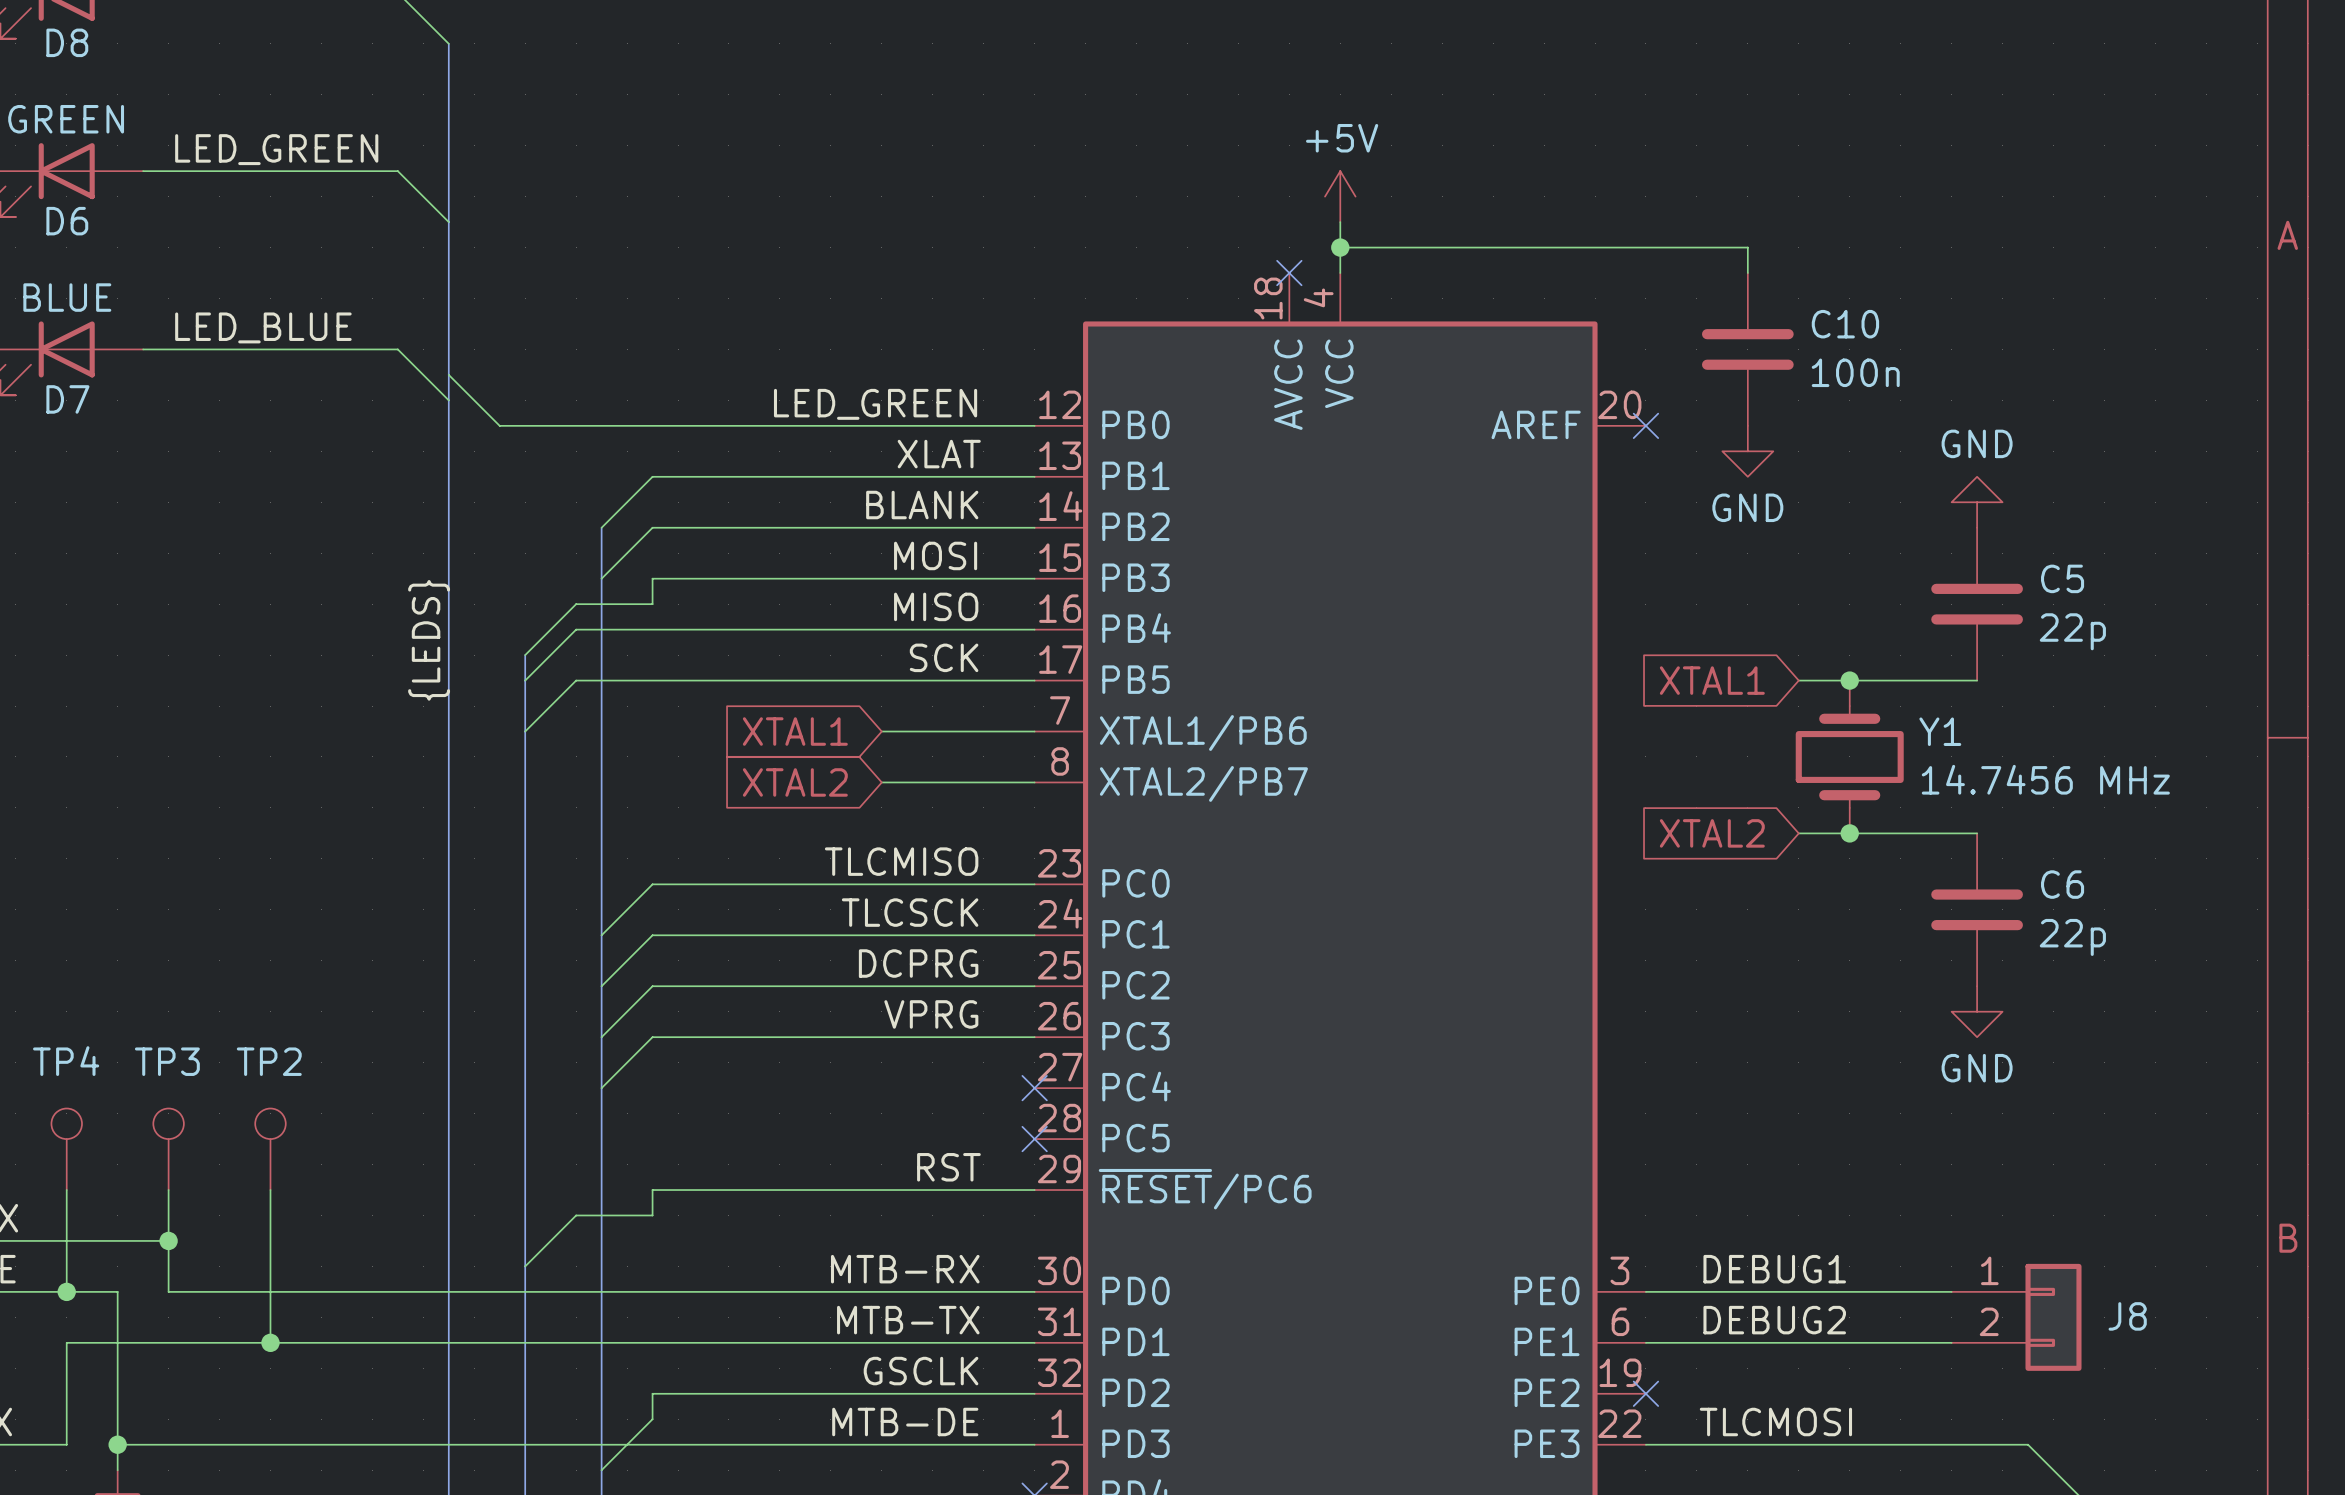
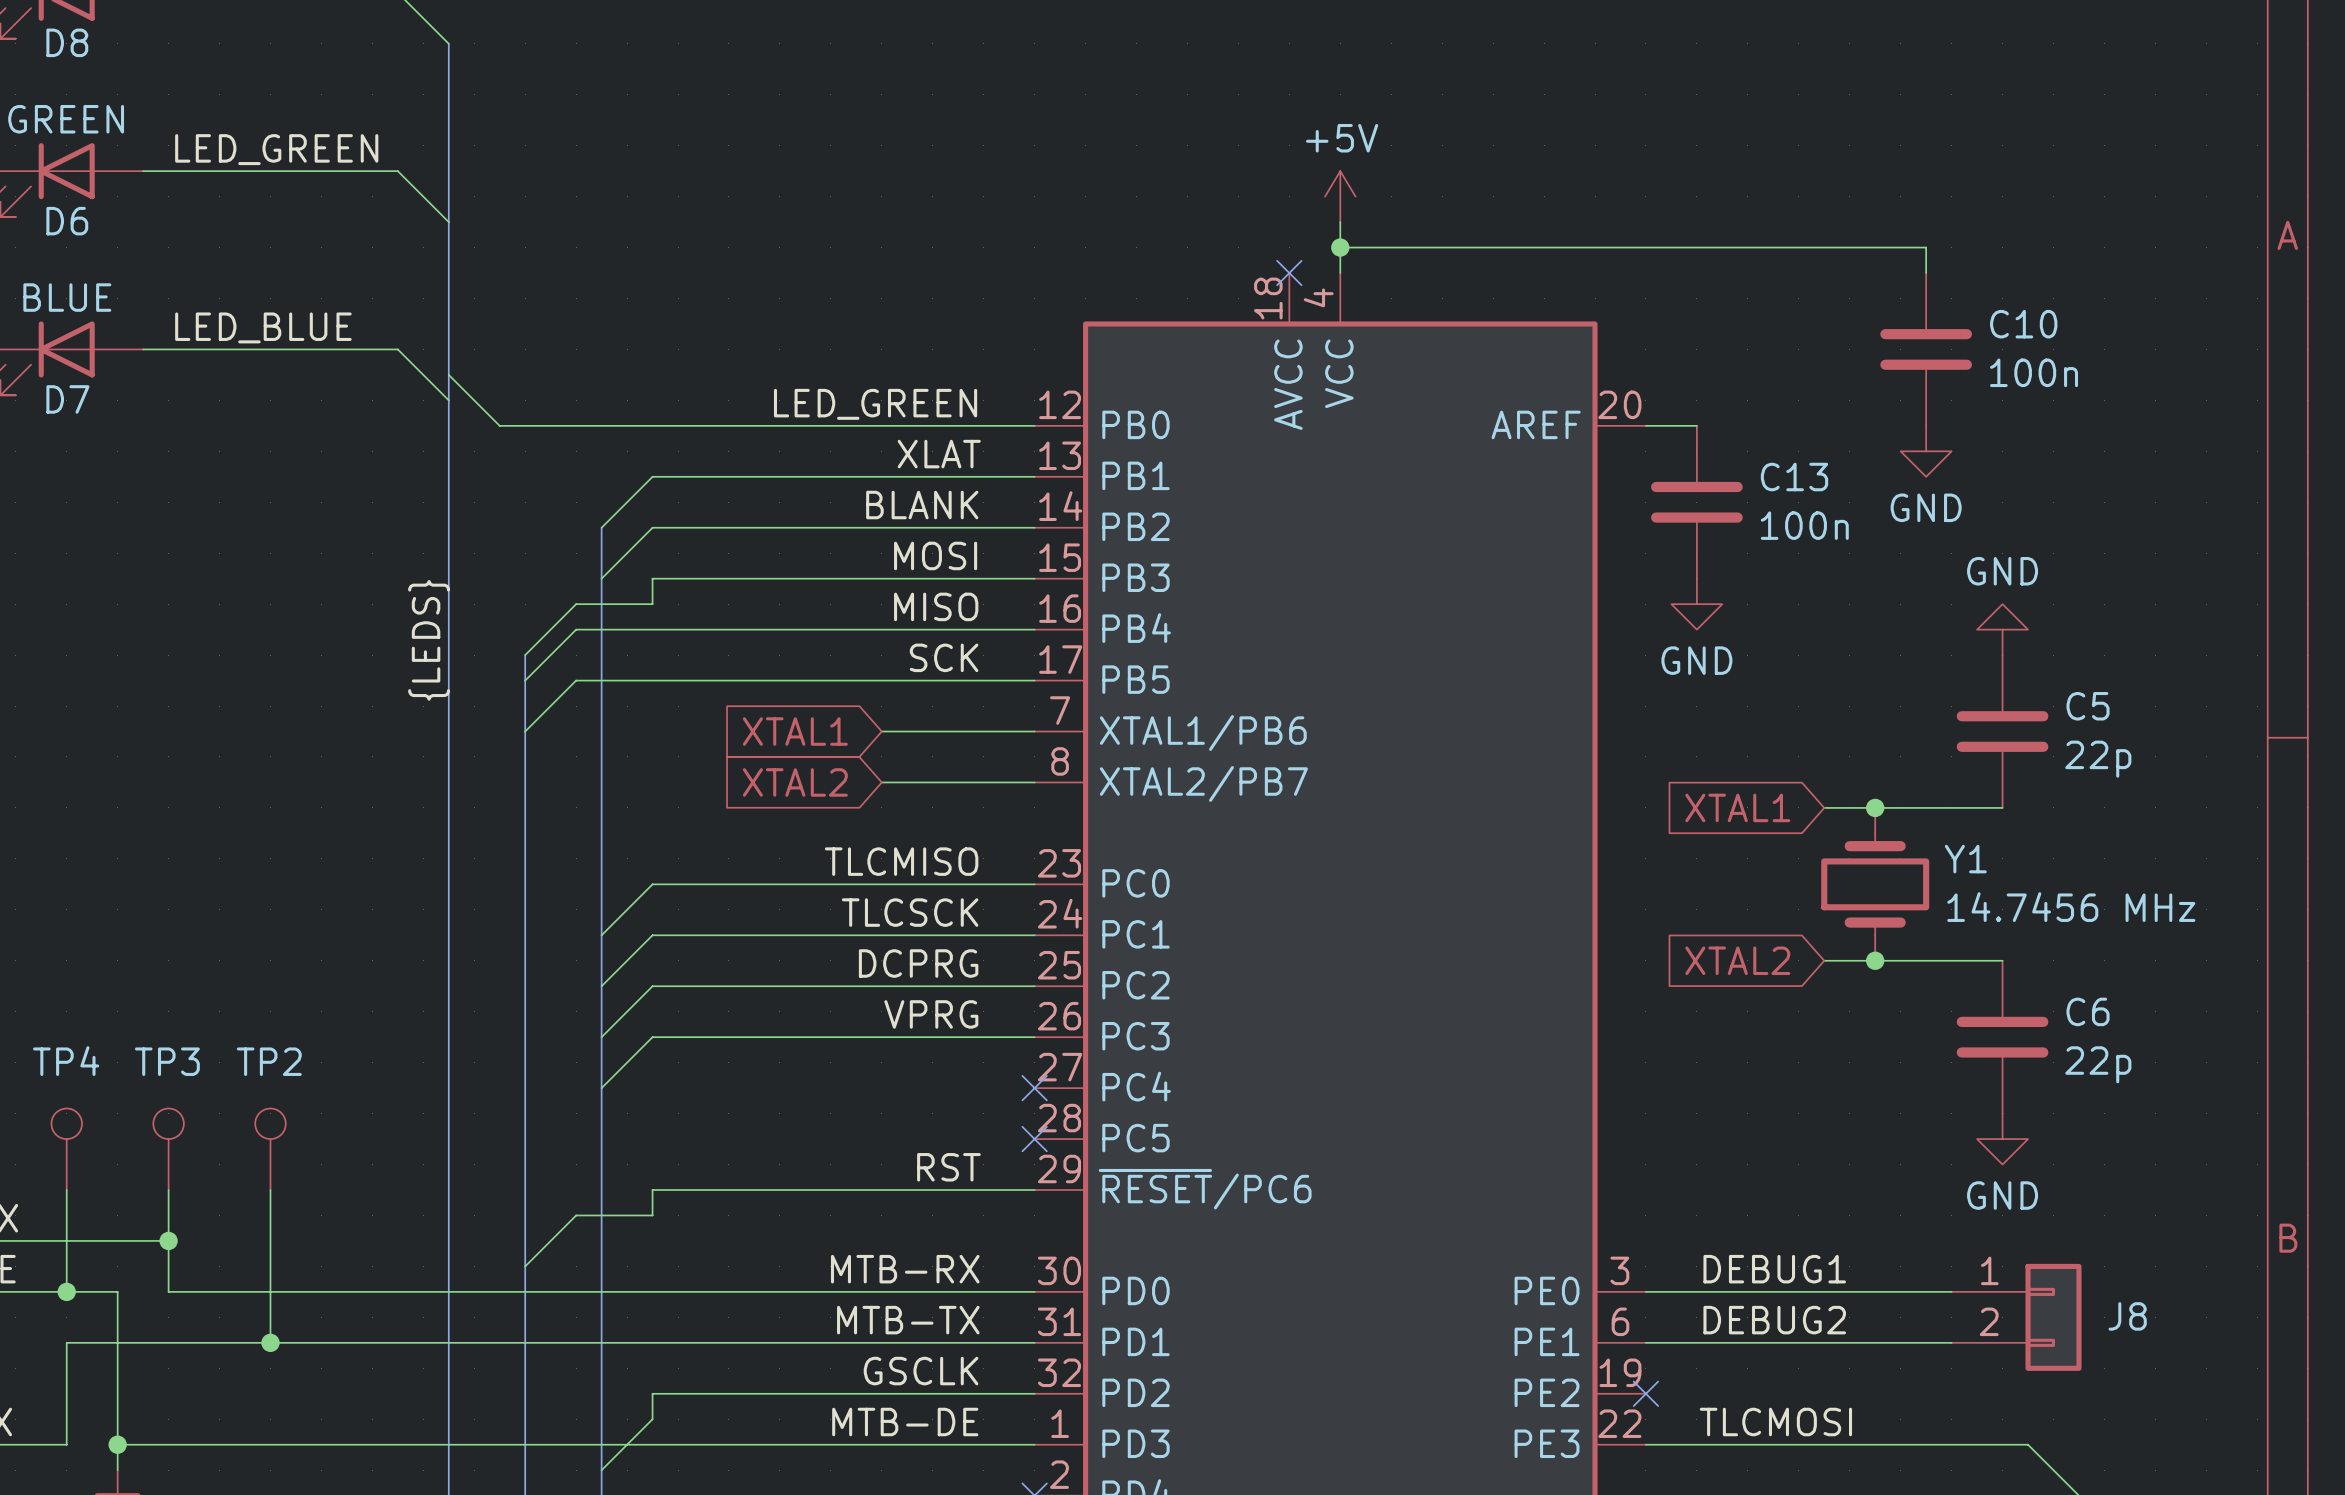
wire: (1747, 247) (1747, 273) -> (1747, 247) (1926, 247) (1926, 273)
C10 position: (1747, 349) -> (1926, 349)
wire: none -> (1645, 425) (1696, 425)
no-connect mark: (1645, 425) -> none
power symbol: GND (1747, 451) -> none
power symbol: none -> GND (1926, 451)
C13: none -> 100n (1696, 502)
power symbol: GND (1977, 502) -> none
power symbol: none -> GND (1696, 604)
C5 position: (1977, 604) -> (2002, 731)
power symbol: none -> GND (2002, 629)
global label position: XTAL1 (1712, 680) -> XTAL1 (1737, 807)
wire: (1798, 680) (1977, 680) -> (1824, 807) (2002, 807)
junction: (1849, 680) -> none
Y1 position: (1849, 756) -> (1875, 884)
global label position: XTAL2 (1712, 833) -> XTAL2 (1737, 960)
wire: (1798, 833) (1977, 833) -> (1824, 960) (2002, 960)
junction position: (1849, 833) -> (1875, 807)
C6 position: (1977, 909) -> (2002, 1037)
junction: none -> (1875, 960)
power symbol position: GND (1977, 1011) -> GND (2002, 1139)

